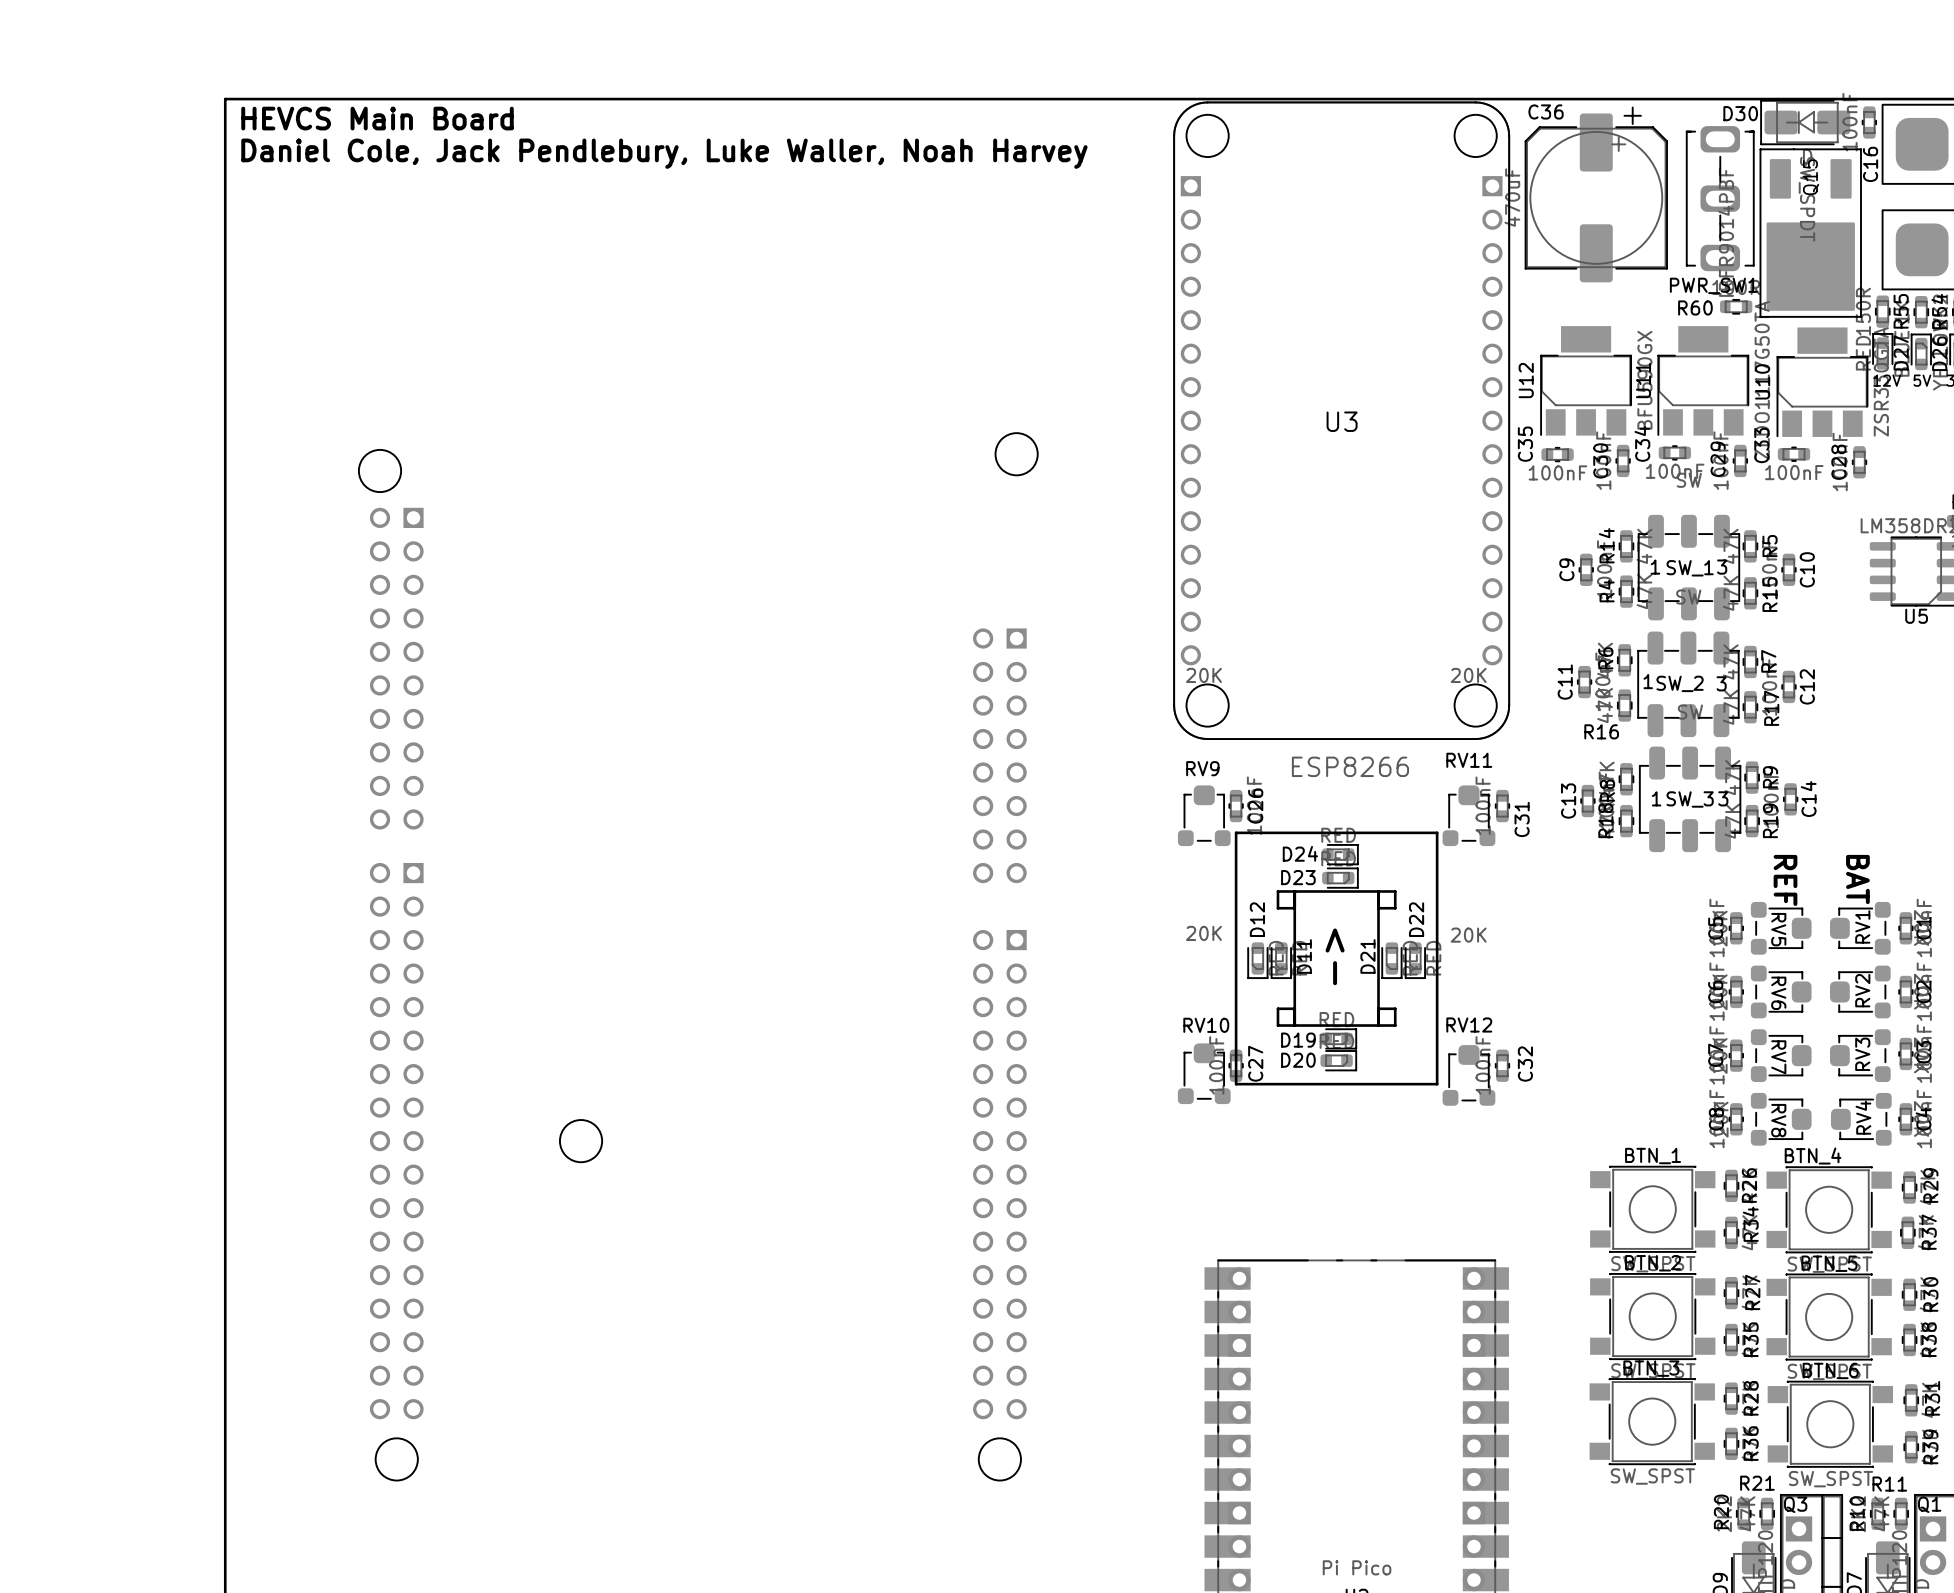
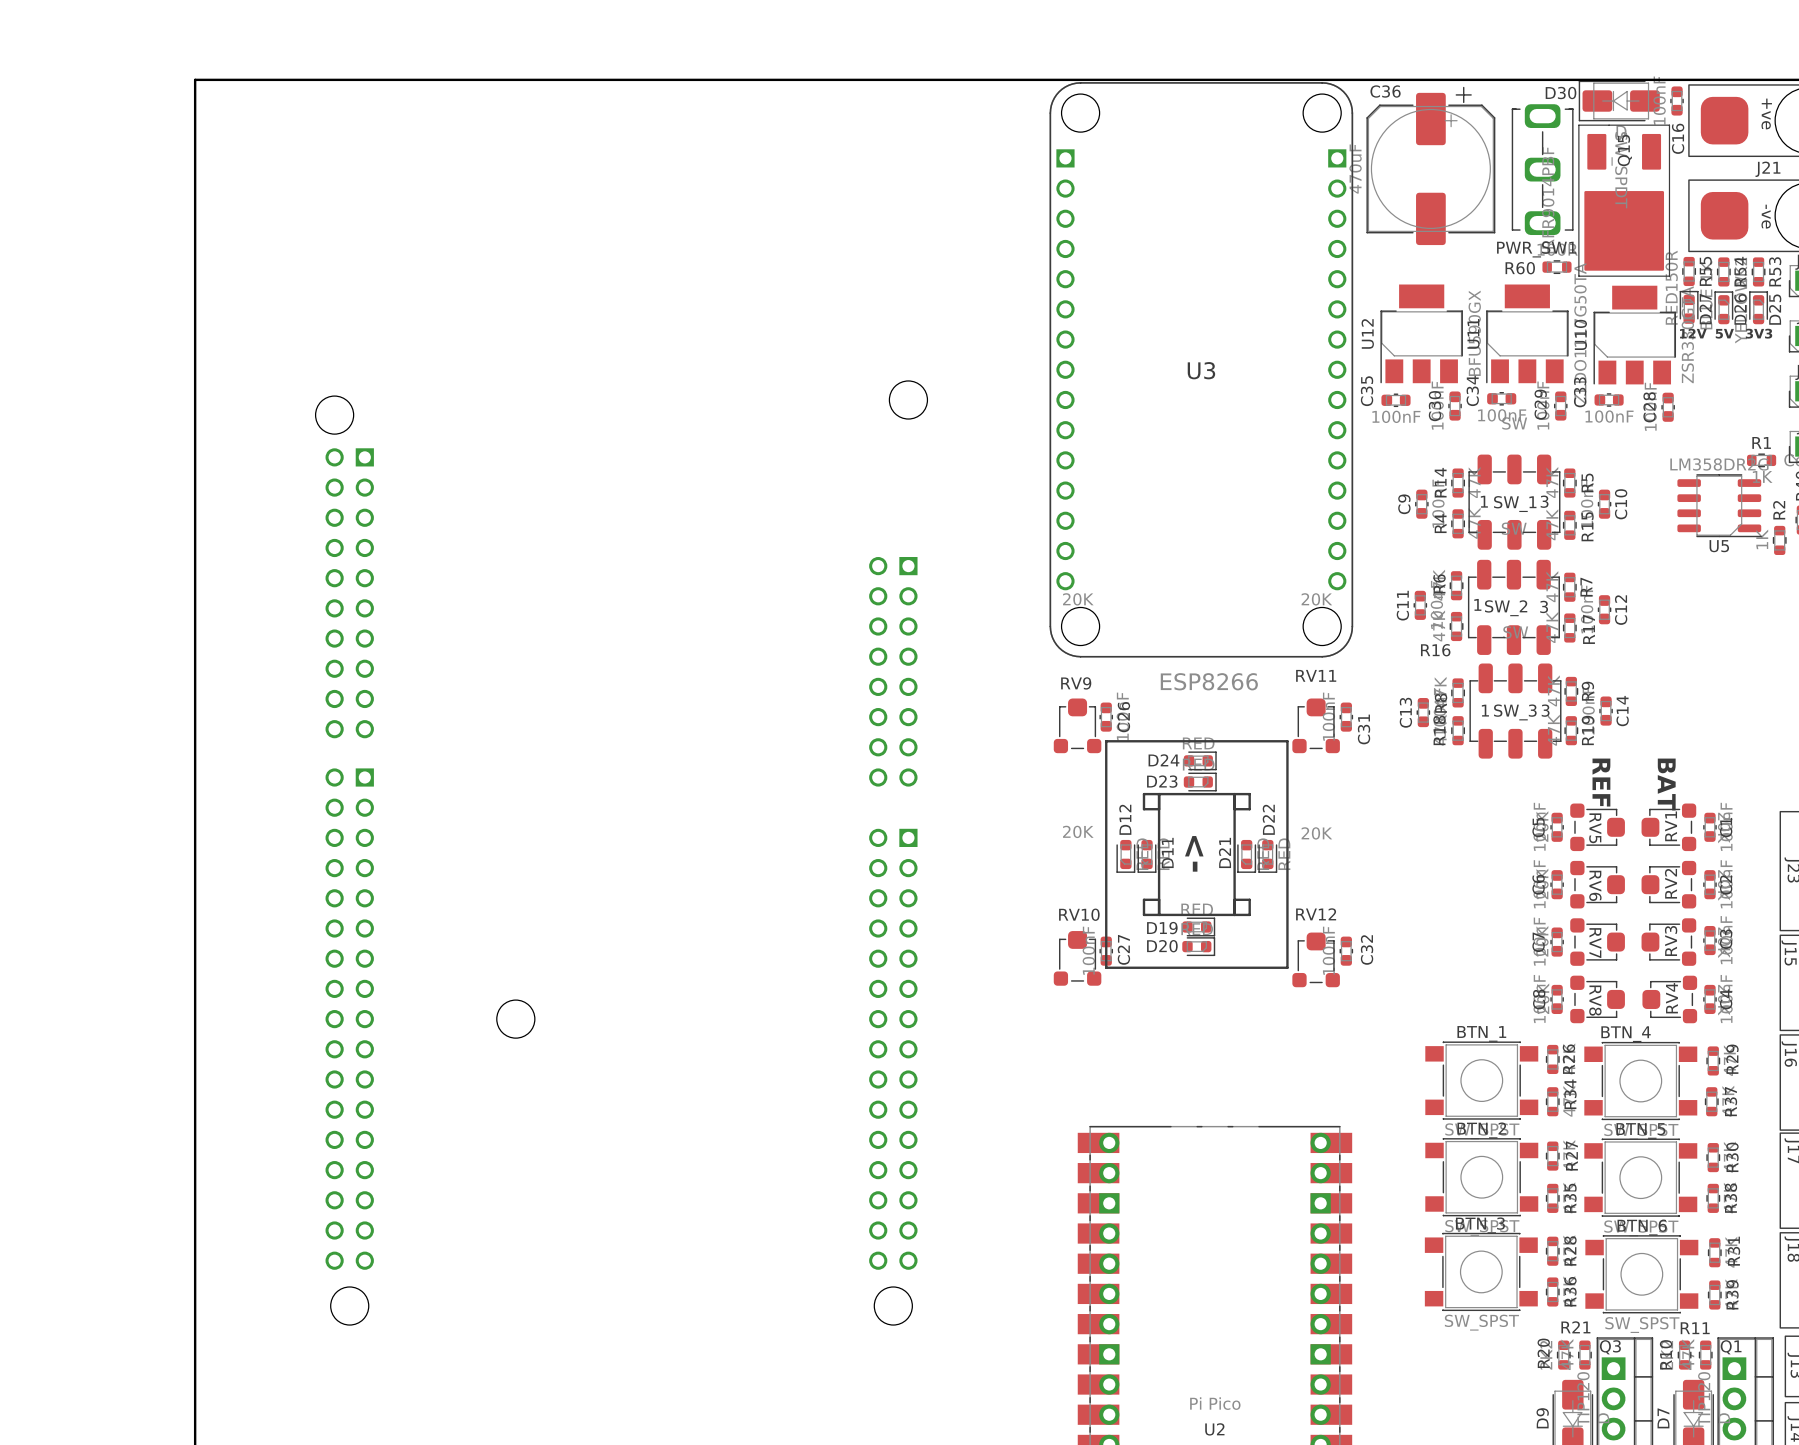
text: HEVCS Main Board (377, 118) -> none
text: Daniel Cole, Jack Pendlebury, Luke Waller, Noah Harvey (664, 153) -> none

